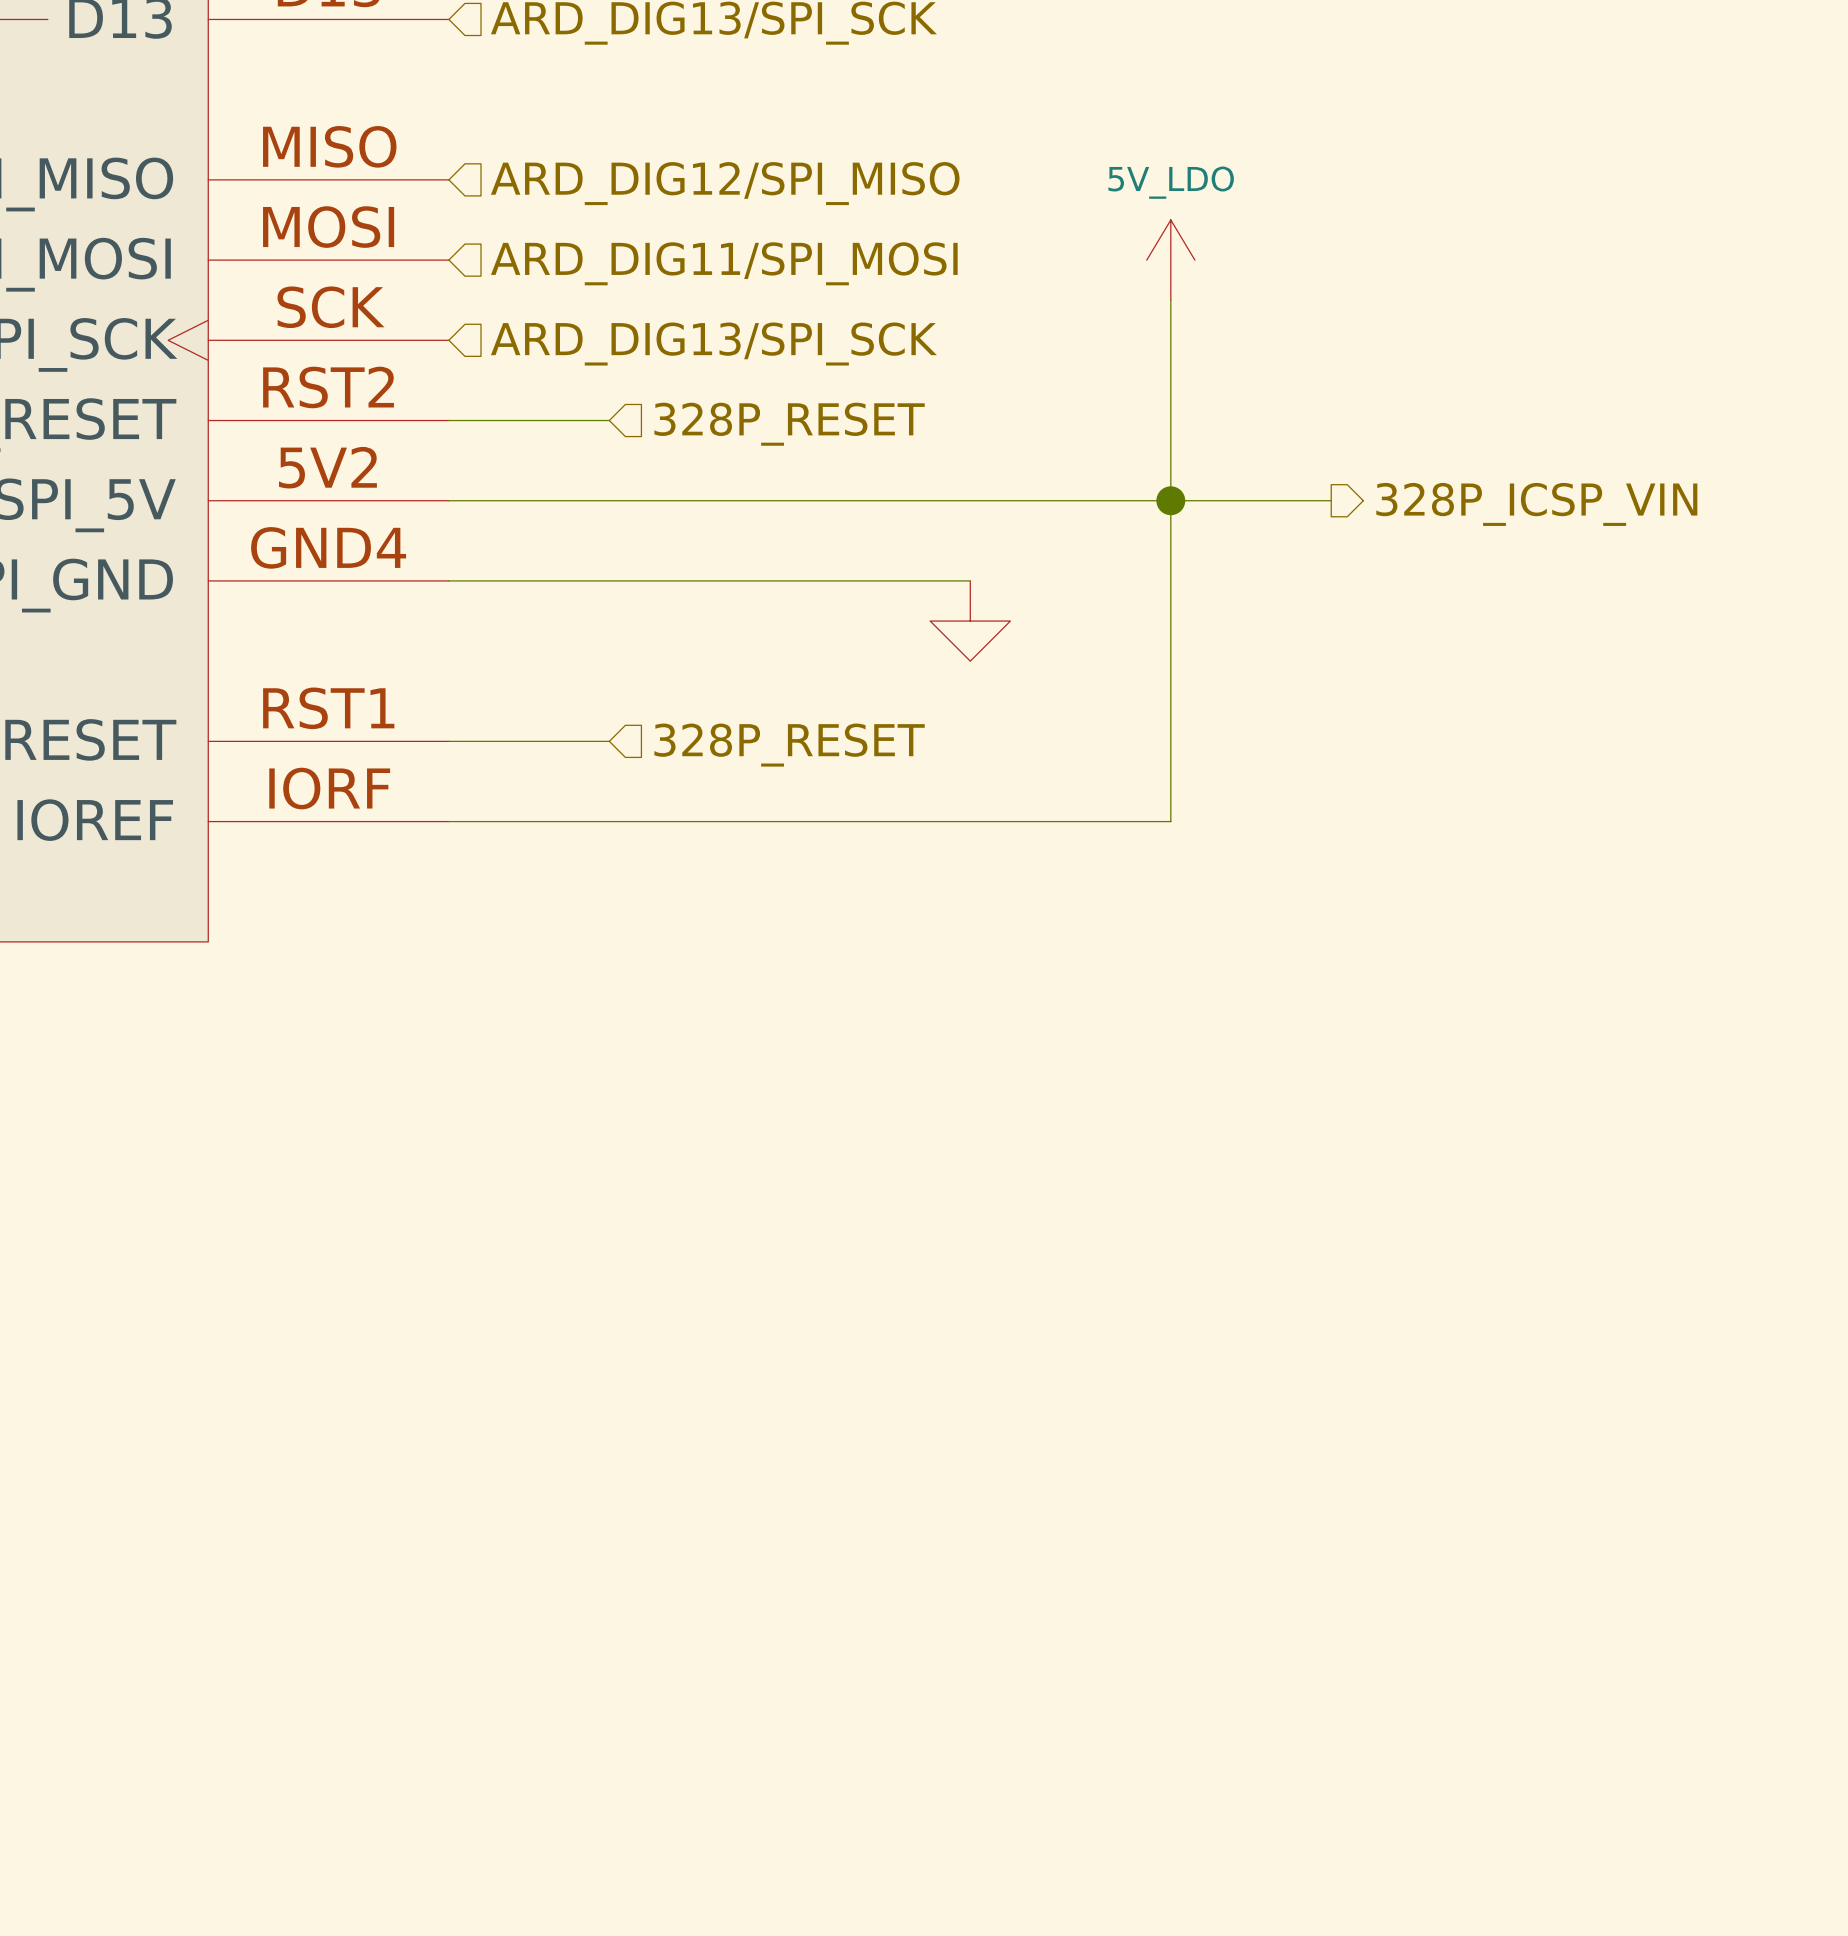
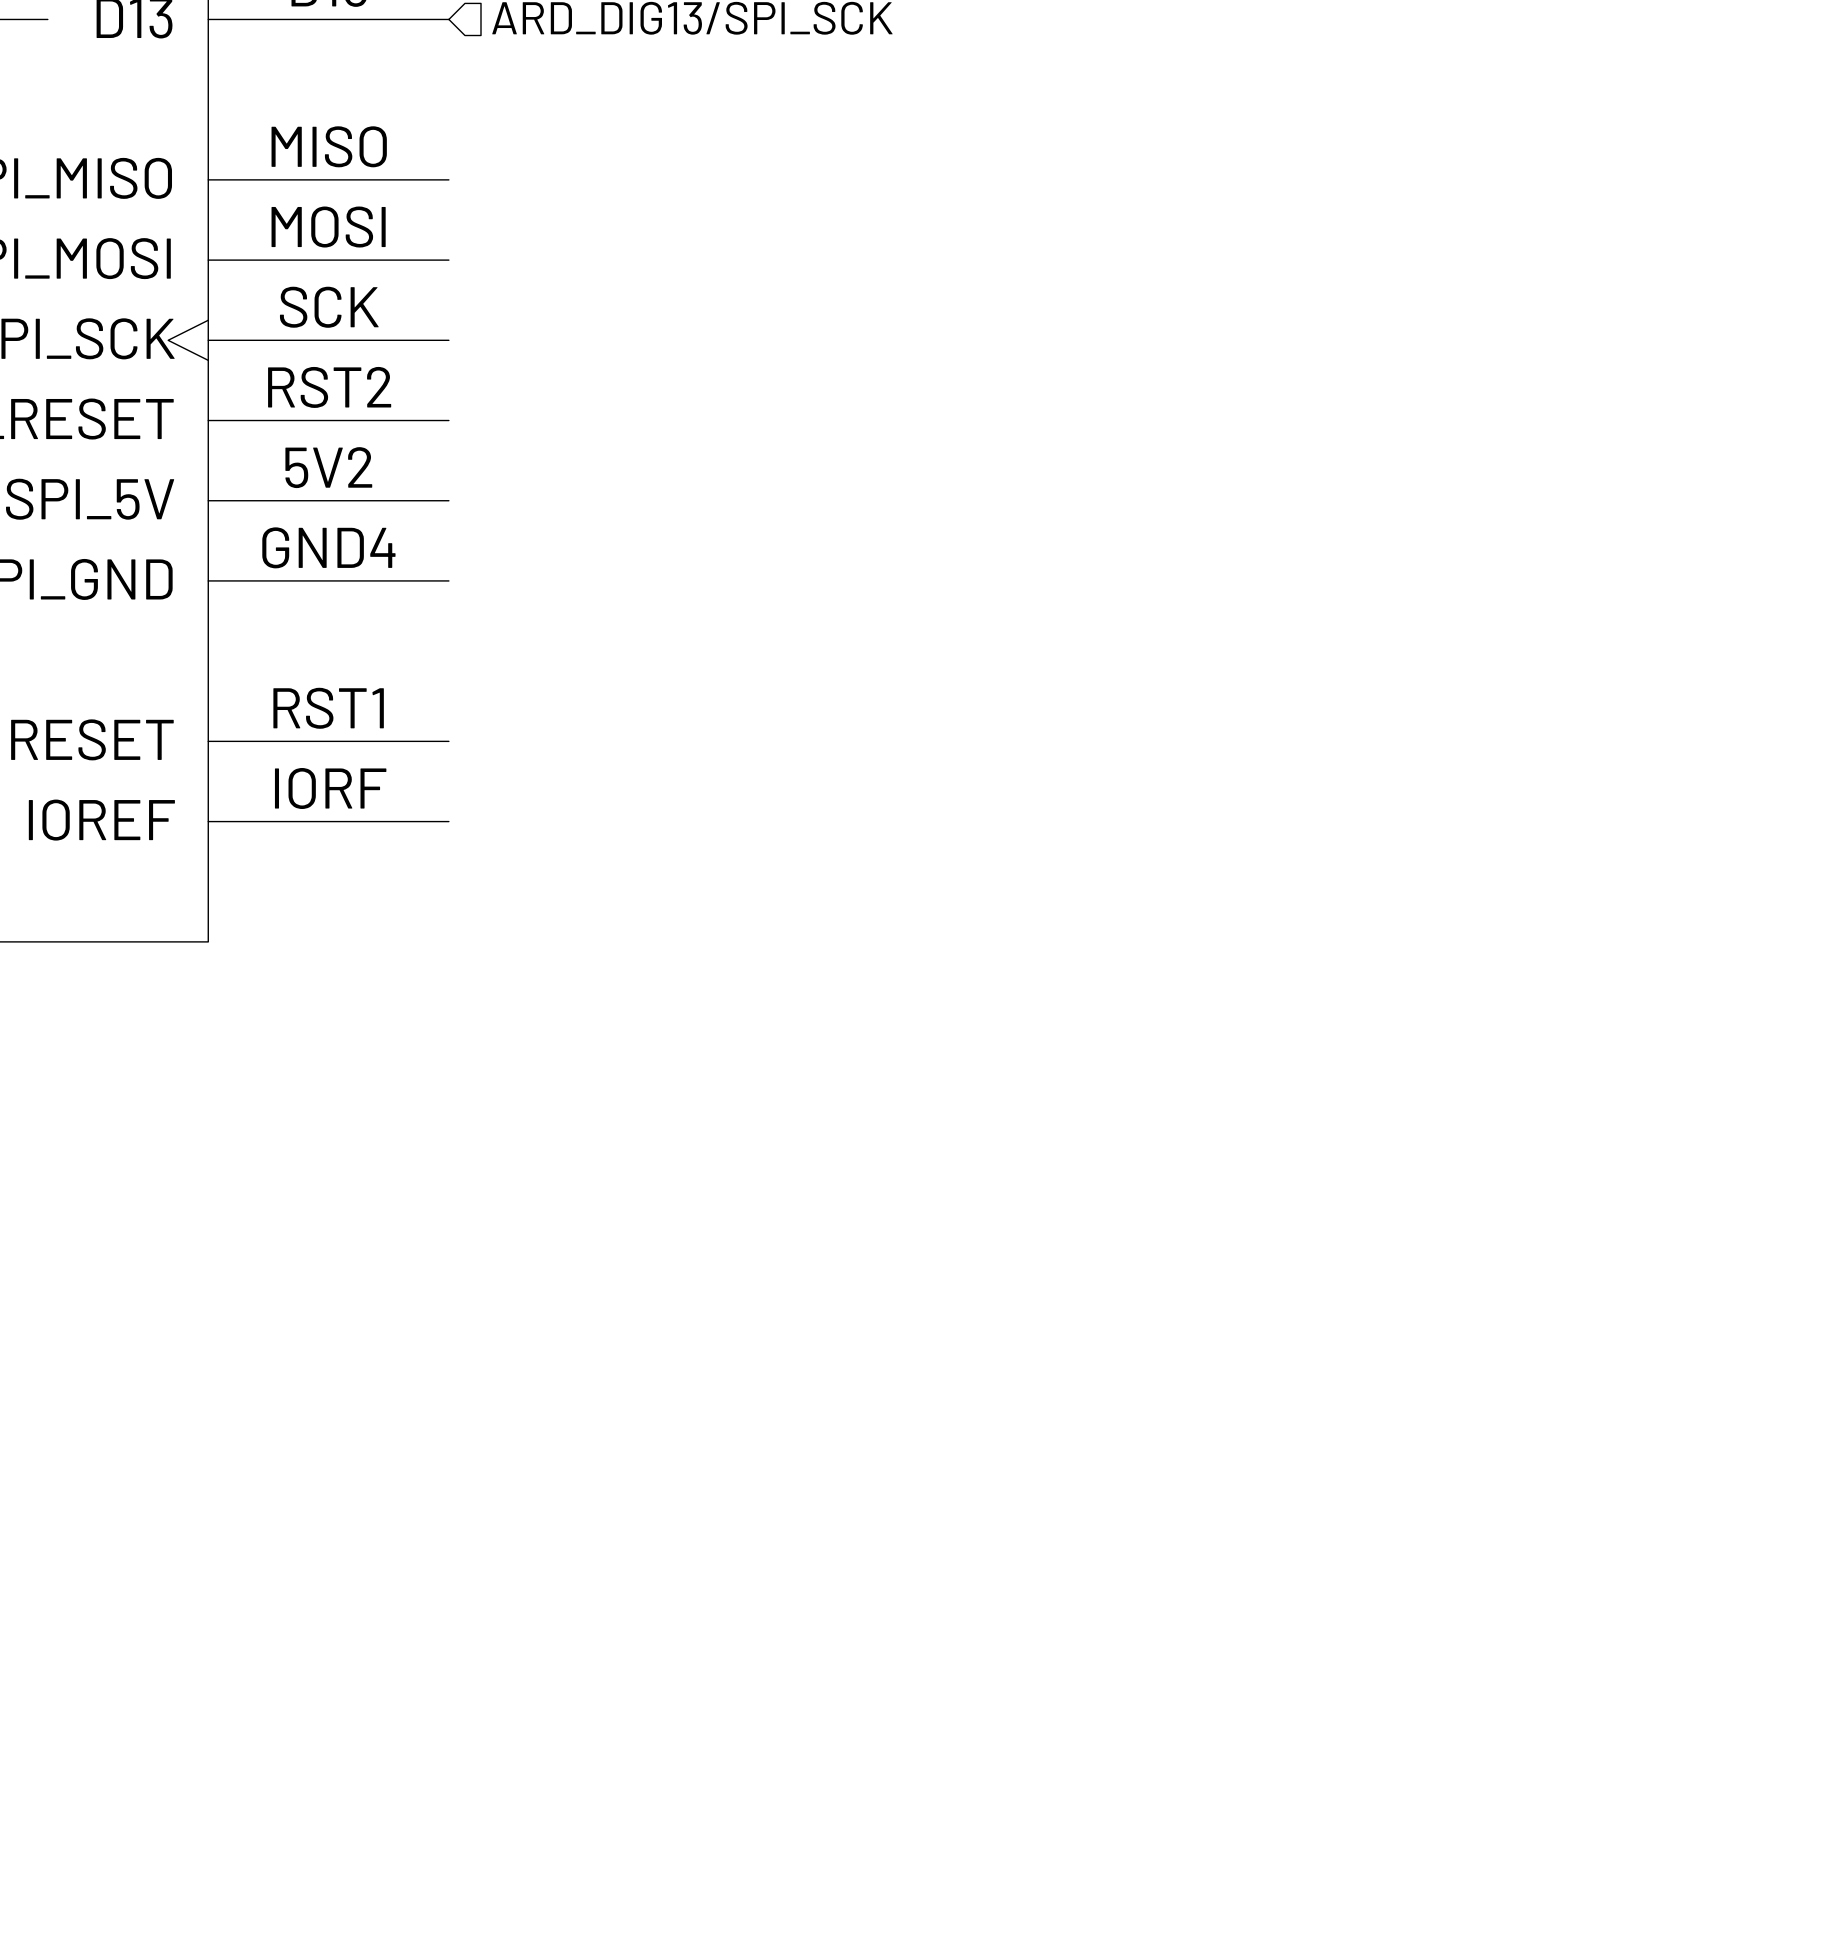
hierarchical label: ARD_DIG12/SPI_MISO (725, 183) -> none
power symbol: 5V_LDO (1170, 260) -> none
hierarchical label: ARD_DIG11/SPI_MOSI (724, 263) -> none
wire: (1170, 300) (1170, 821) (448, 821) -> none
hierarchical label: ARD_DIG13/SPI_SCK (713, 344) -> none
wire: (448, 420) (609, 420) -> none
hierarchical label: 328P_RESET (789, 424) -> none
wire: (448, 500) (1331, 500) -> none
junction: (1170, 500) -> none
hierarchical label: 328P_ICSP_VIN (1536, 504) -> none
wire: (448, 580) (970, 580) -> none
power symbol: (970, 621) -> none
wire: (448, 741) (609, 741) -> none
hierarchical label: 328P_RESET (789, 745) -> none

